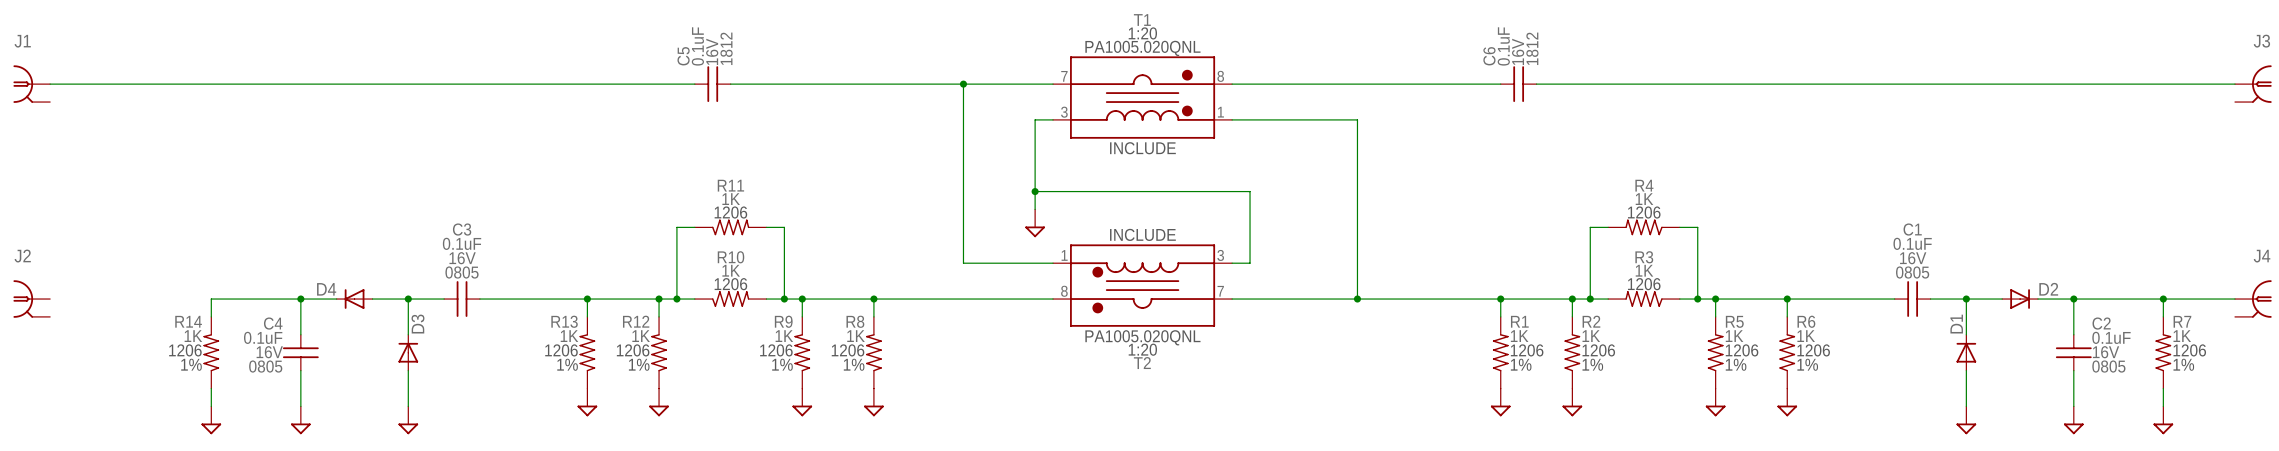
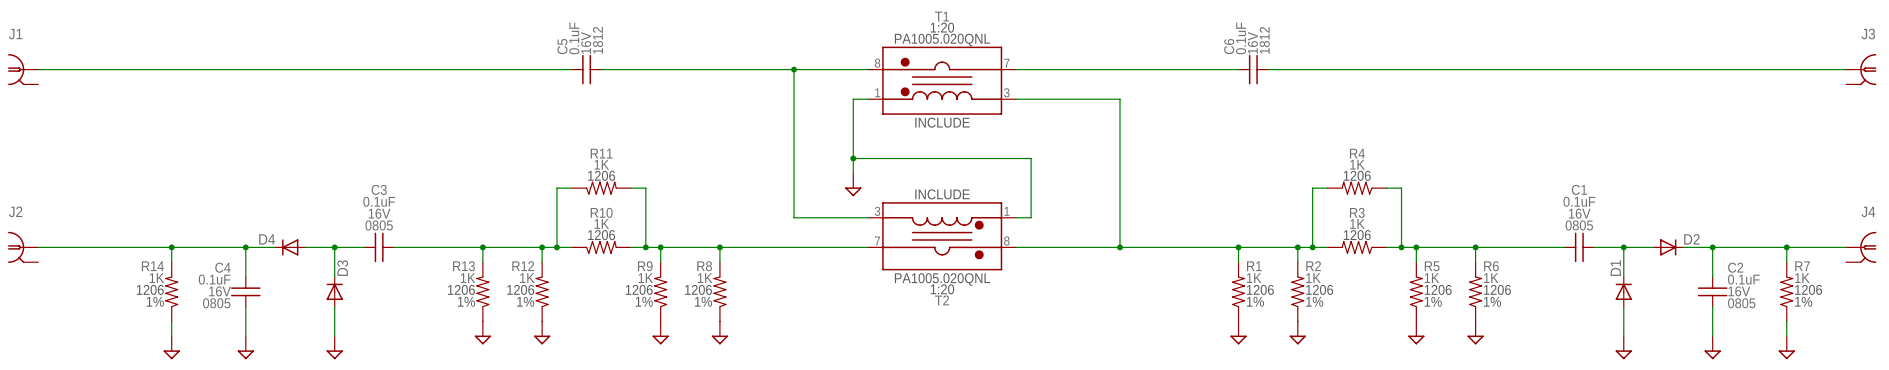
T1 flip: as is (1142, 97) -> left-right (942, 80)
T2 flip: as is (1142, 285) -> left-right (942, 236)
wire: none -> (38, 247) (171, 247)
junction: none -> (171, 247)

